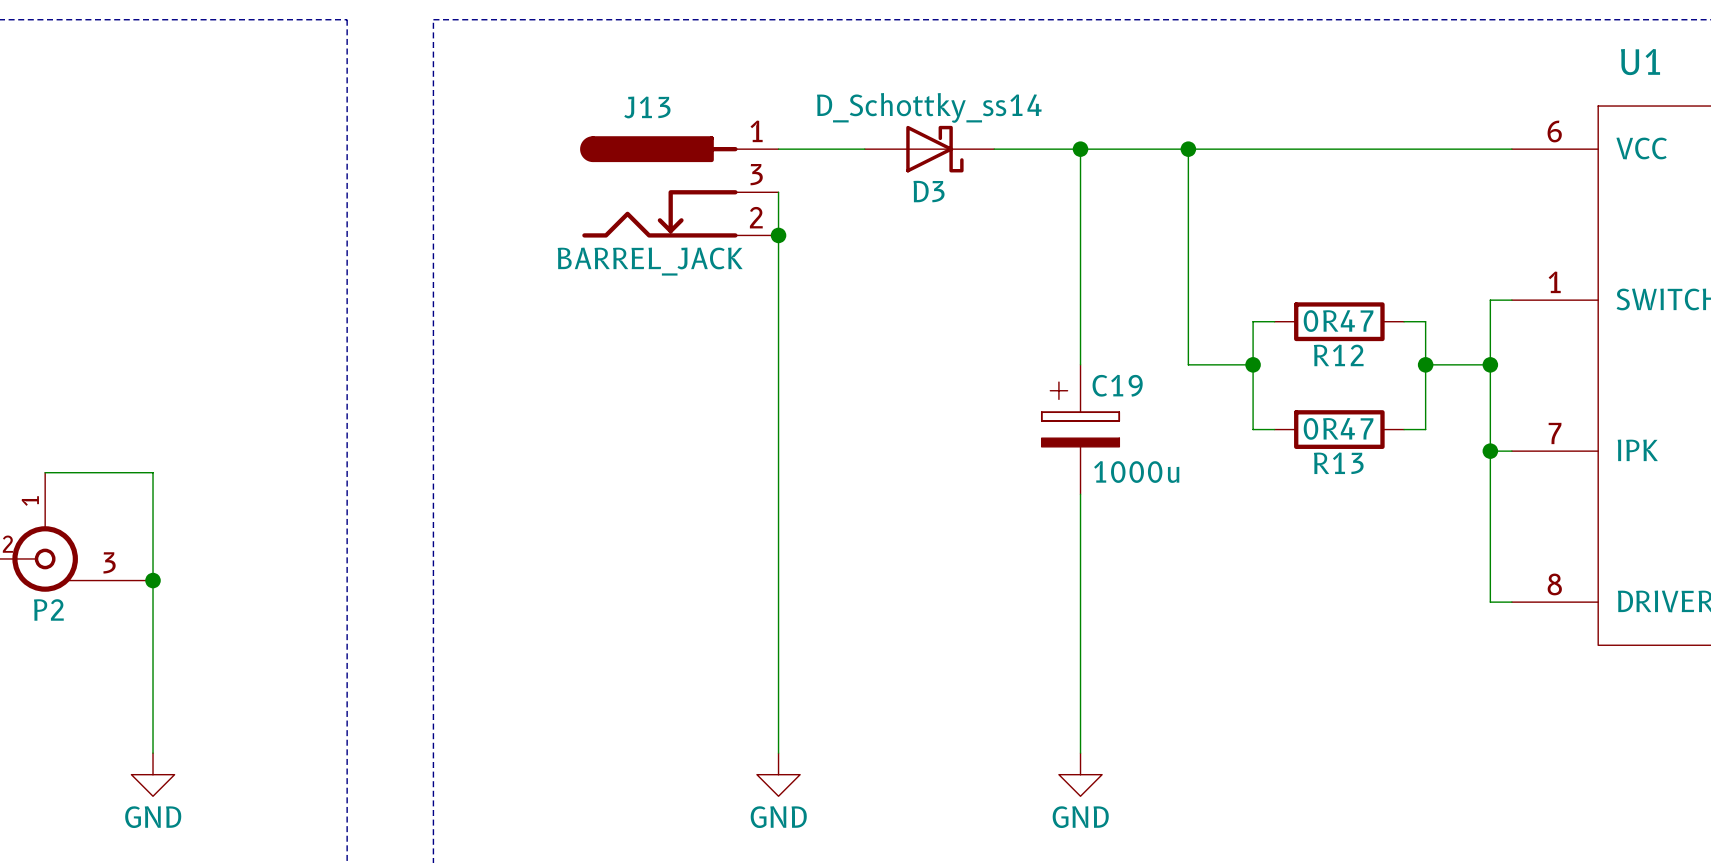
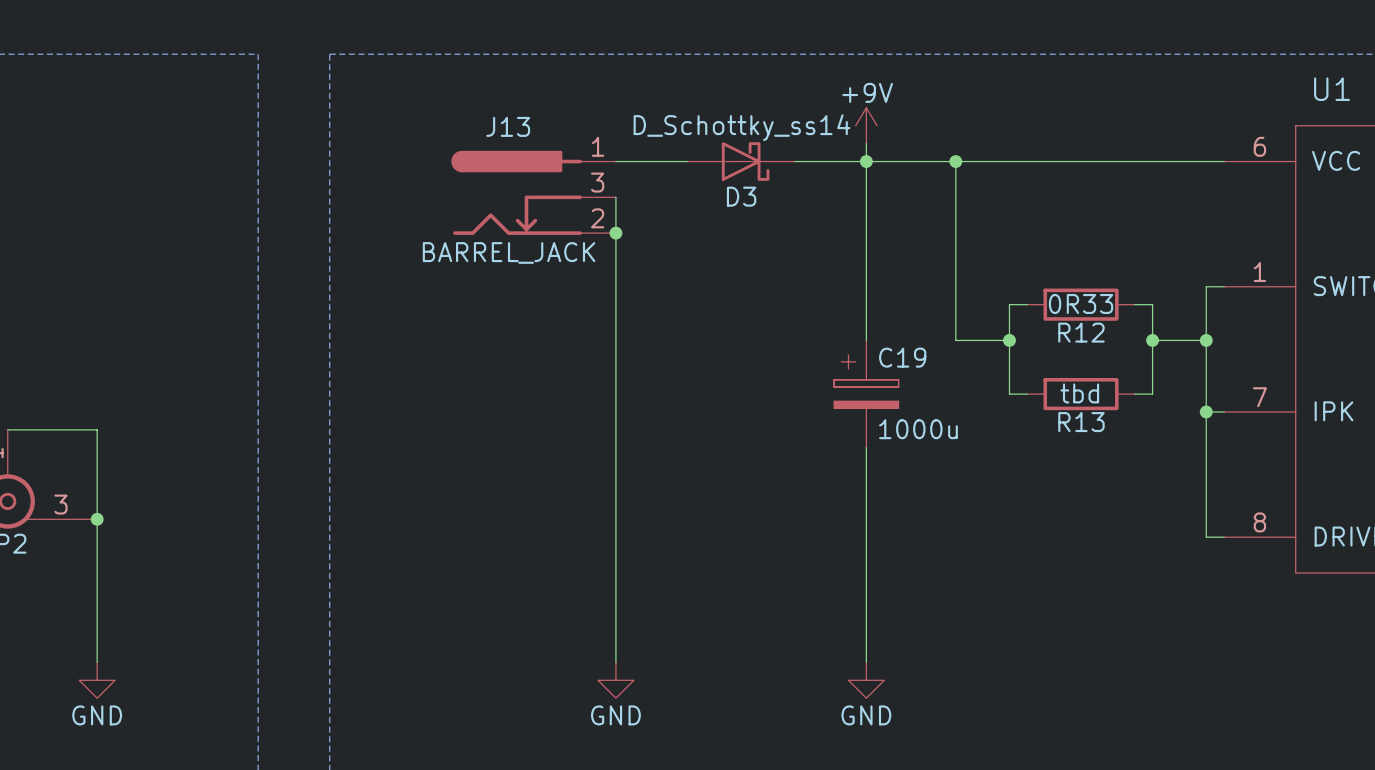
power symbol: none -> +9V (866, 125)
wire: none -> (866, 143) (866, 161)
R12 value: 0R47 (1338, 321) -> 0R33 (1081, 303)
R13 value: 0R47 (1338, 428) -> tbd (1079, 393)

